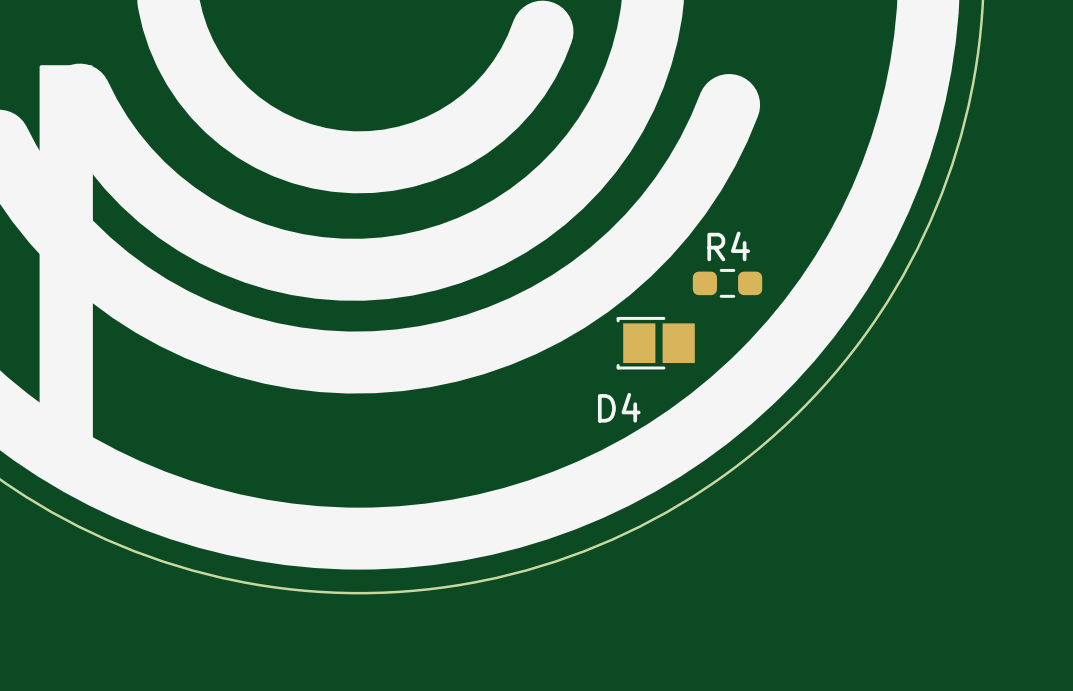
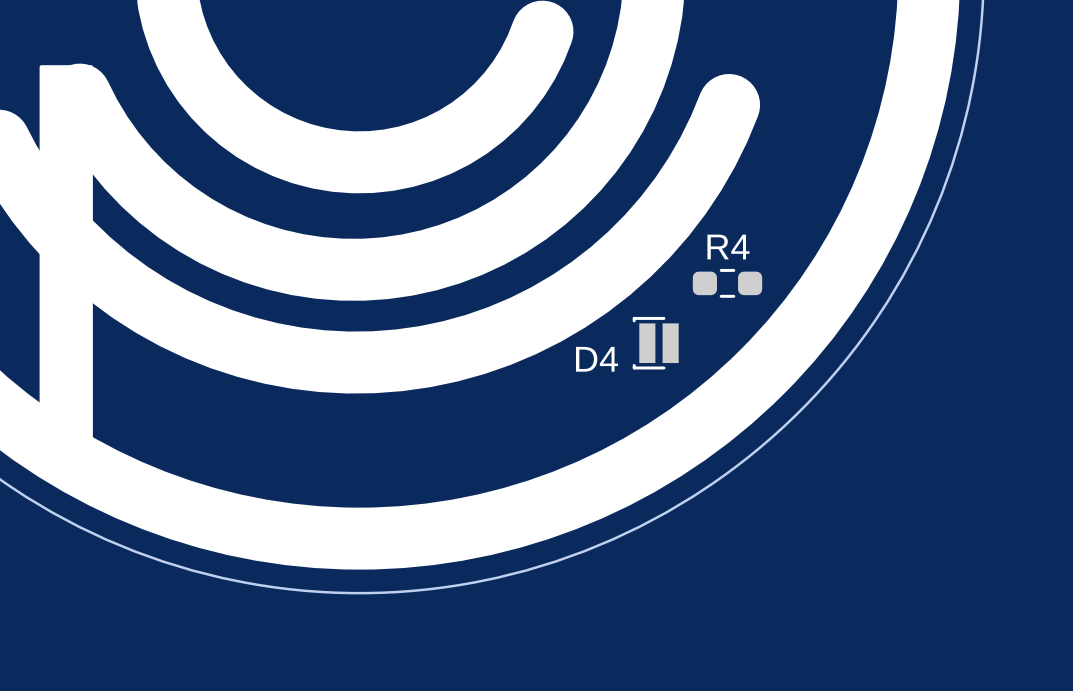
D4 footprint: [616, 316, 695, 370] -> [632, 316, 679, 370]
D4 name position: D4 (619, 407) -> D4 (597, 359)

